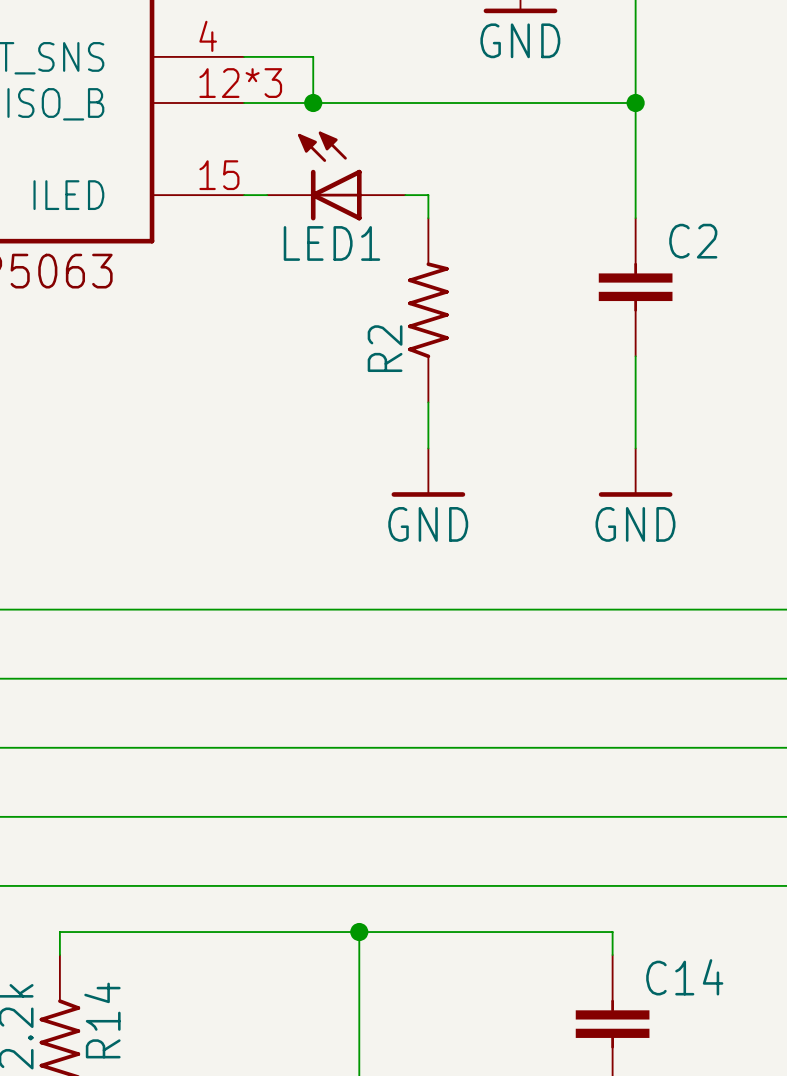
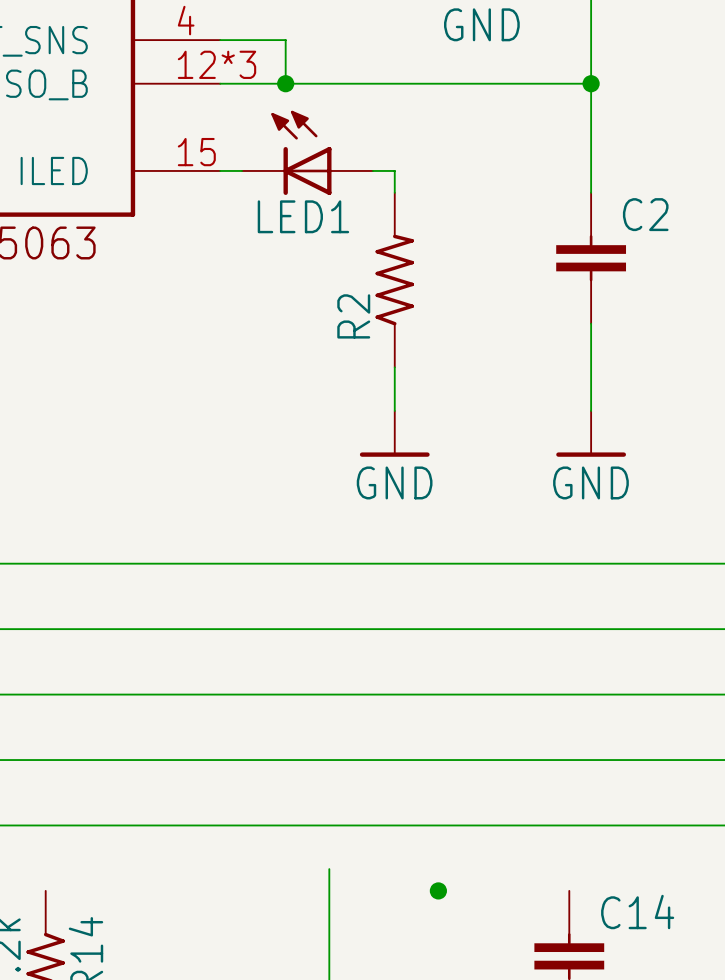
junction: (359, 932) -> none
wire: (59, 955) (59, 932) (612, 932) (612, 955) -> none
junction: none -> (438, 890)

